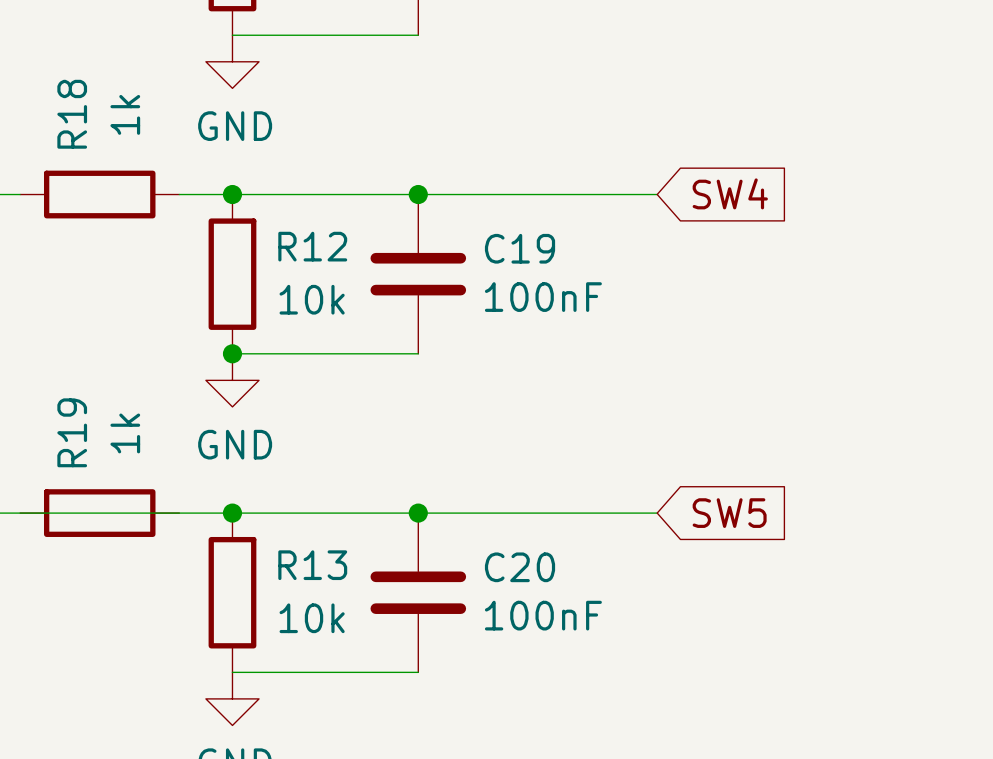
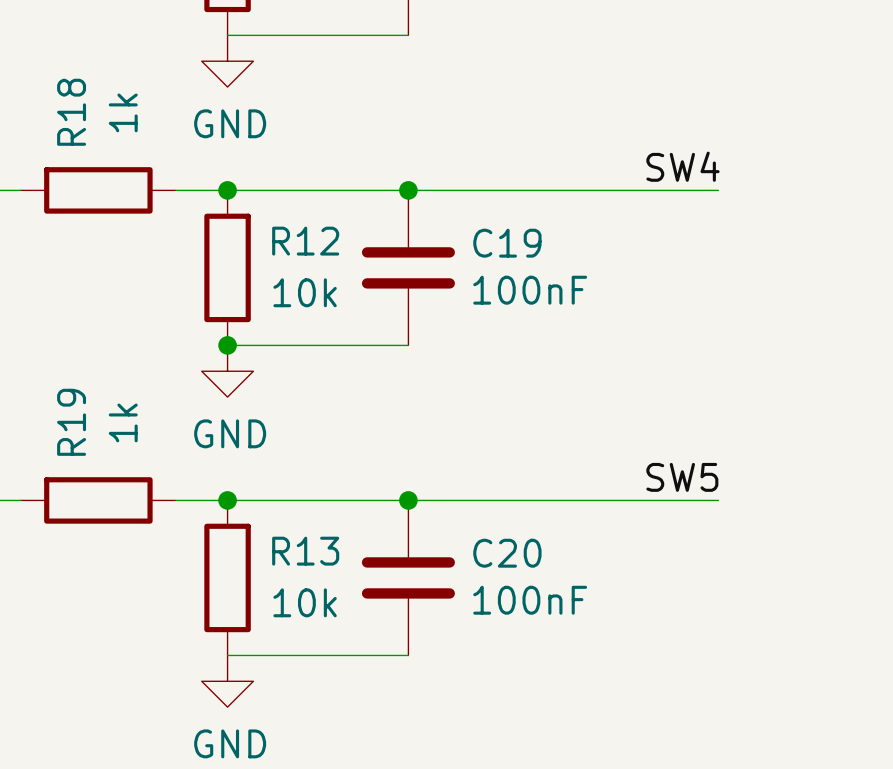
label: none -> SW4 (682, 166)
global label: SW4 (730, 193) -> none
wire: none -> (640, 190) (718, 190)
label: none -> SW5 (682, 477)
wire: (20, 513) (179, 513) -> none
wire: none -> (640, 500) (718, 500)
global label: SW5 (729, 513) -> none

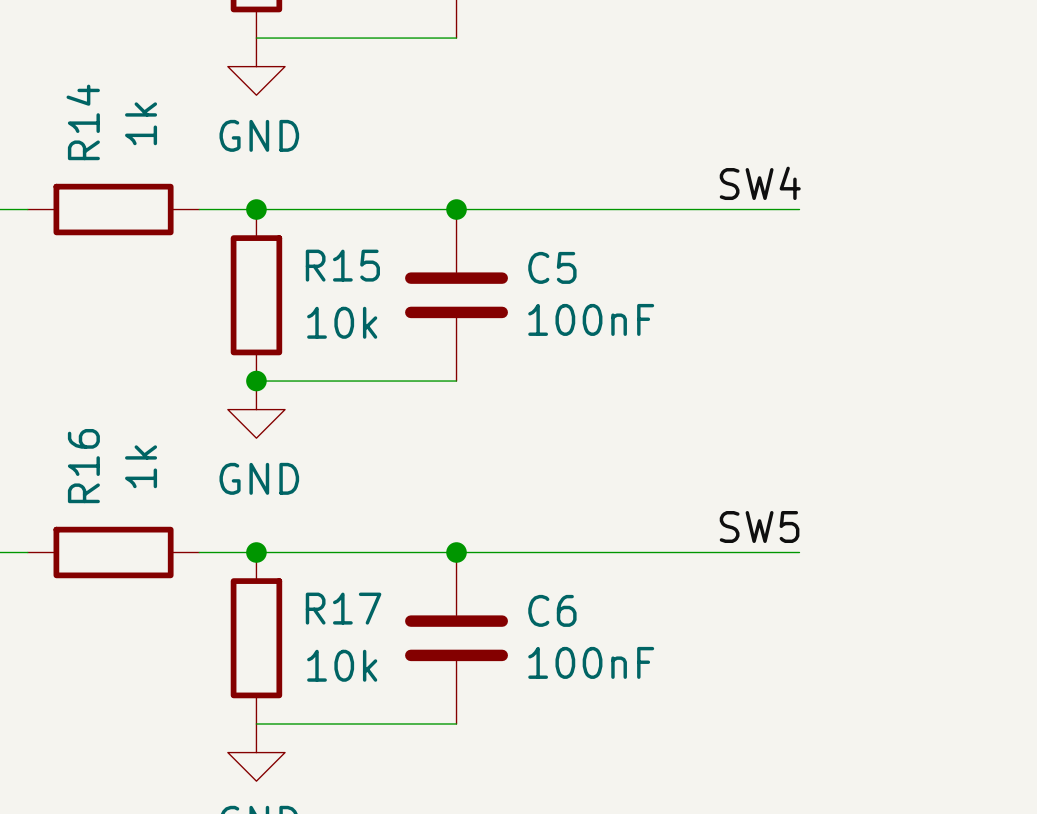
R18 name: R18 (71, 112) -> R14 (83, 122)
R12 name: R12 (305, 241) -> R15 (342, 265)
C19 name: C19 (507, 243) -> C5 (552, 267)
R19 name: R19 (71, 422) -> R16 (83, 466)
R13 name: R13 (305, 551) -> R17 (343, 608)
C20 name: C20 (507, 553) -> C6 (552, 610)

